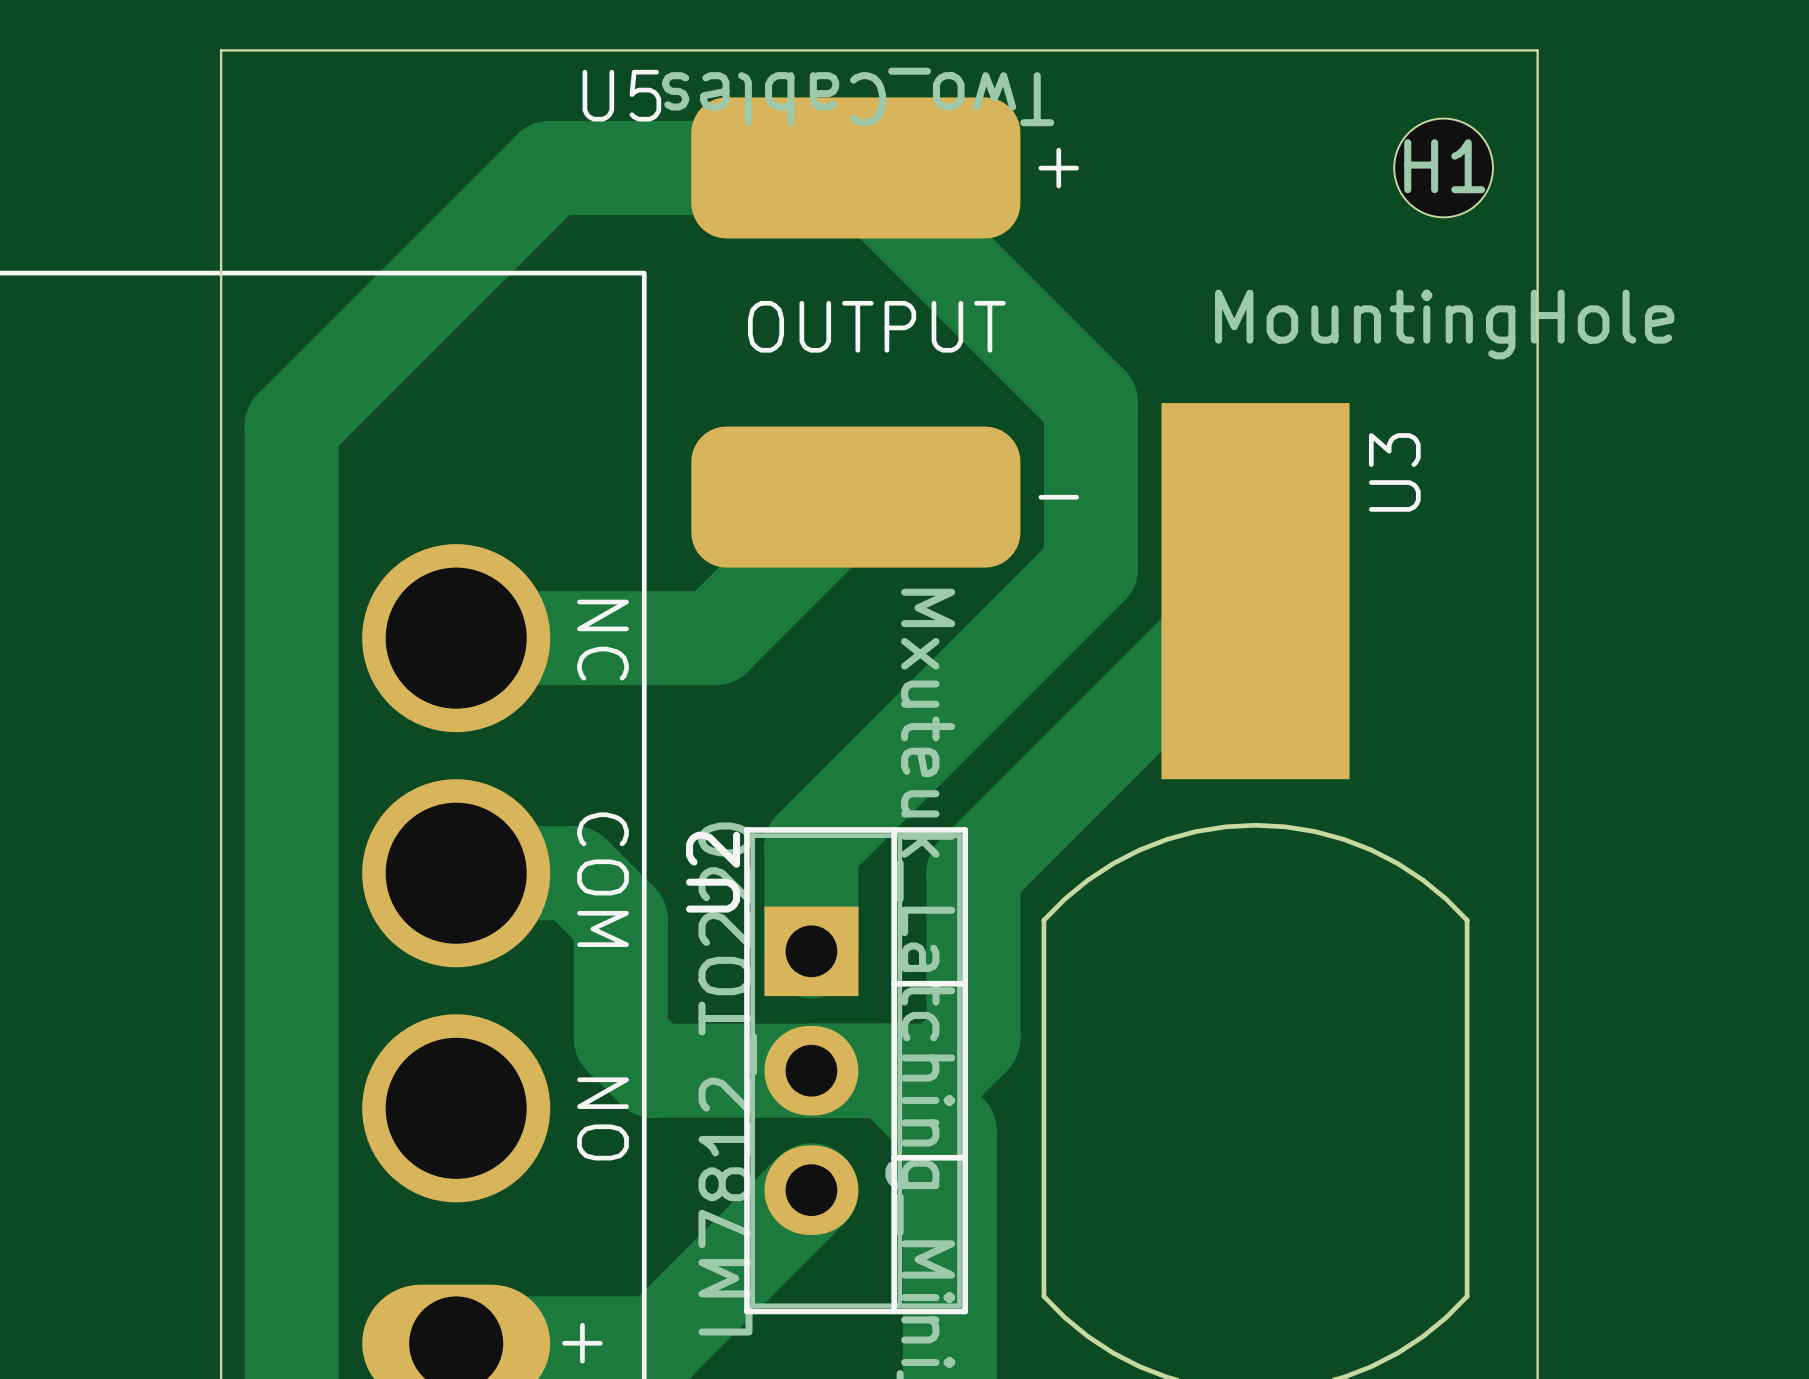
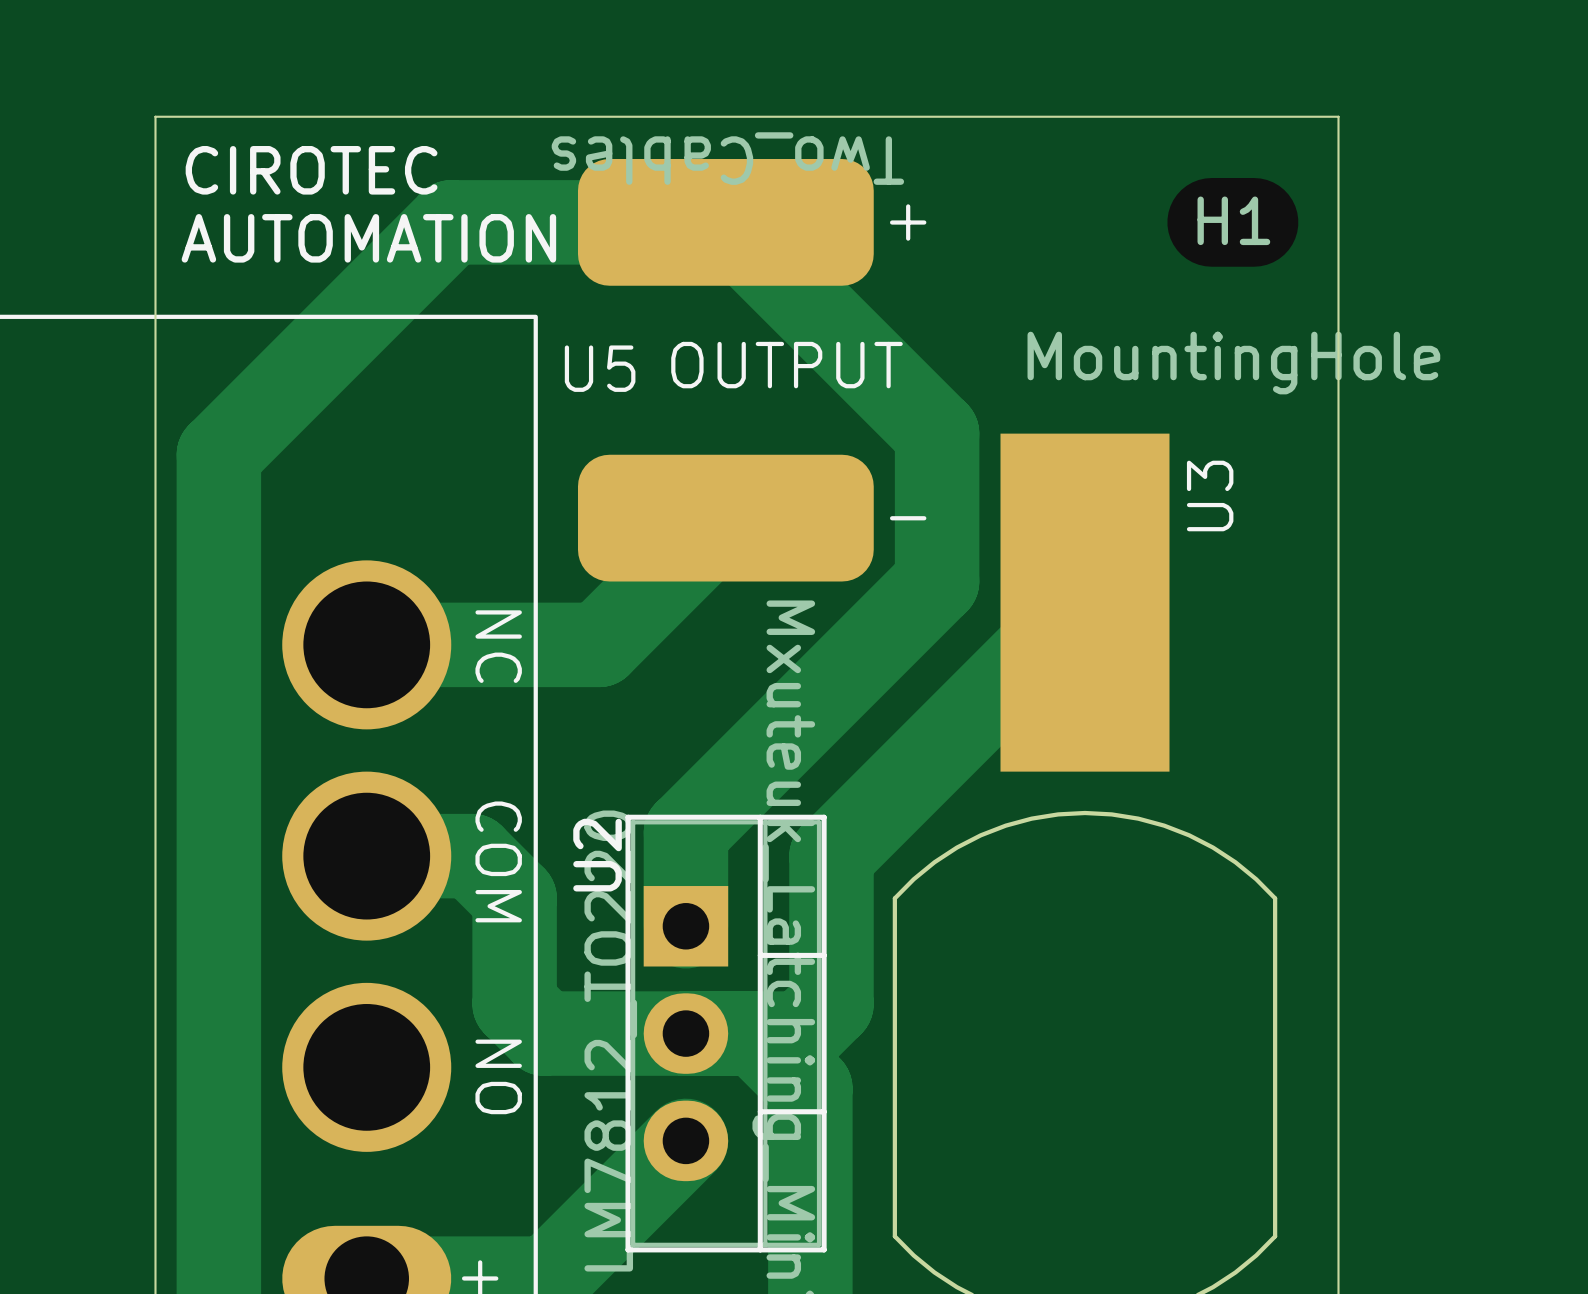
U5 name position: U5 (621, 95) -> U5 (600, 368)
text: none -> CIROTEC (311, 170)
H1 footprint: [1394, 118, 1493, 218] -> [1167, 178, 1299, 267]
text: none -> AUTOMATION (368, 238)
text position: OUTPUT (876, 326) -> OUTPUT (786, 365)

